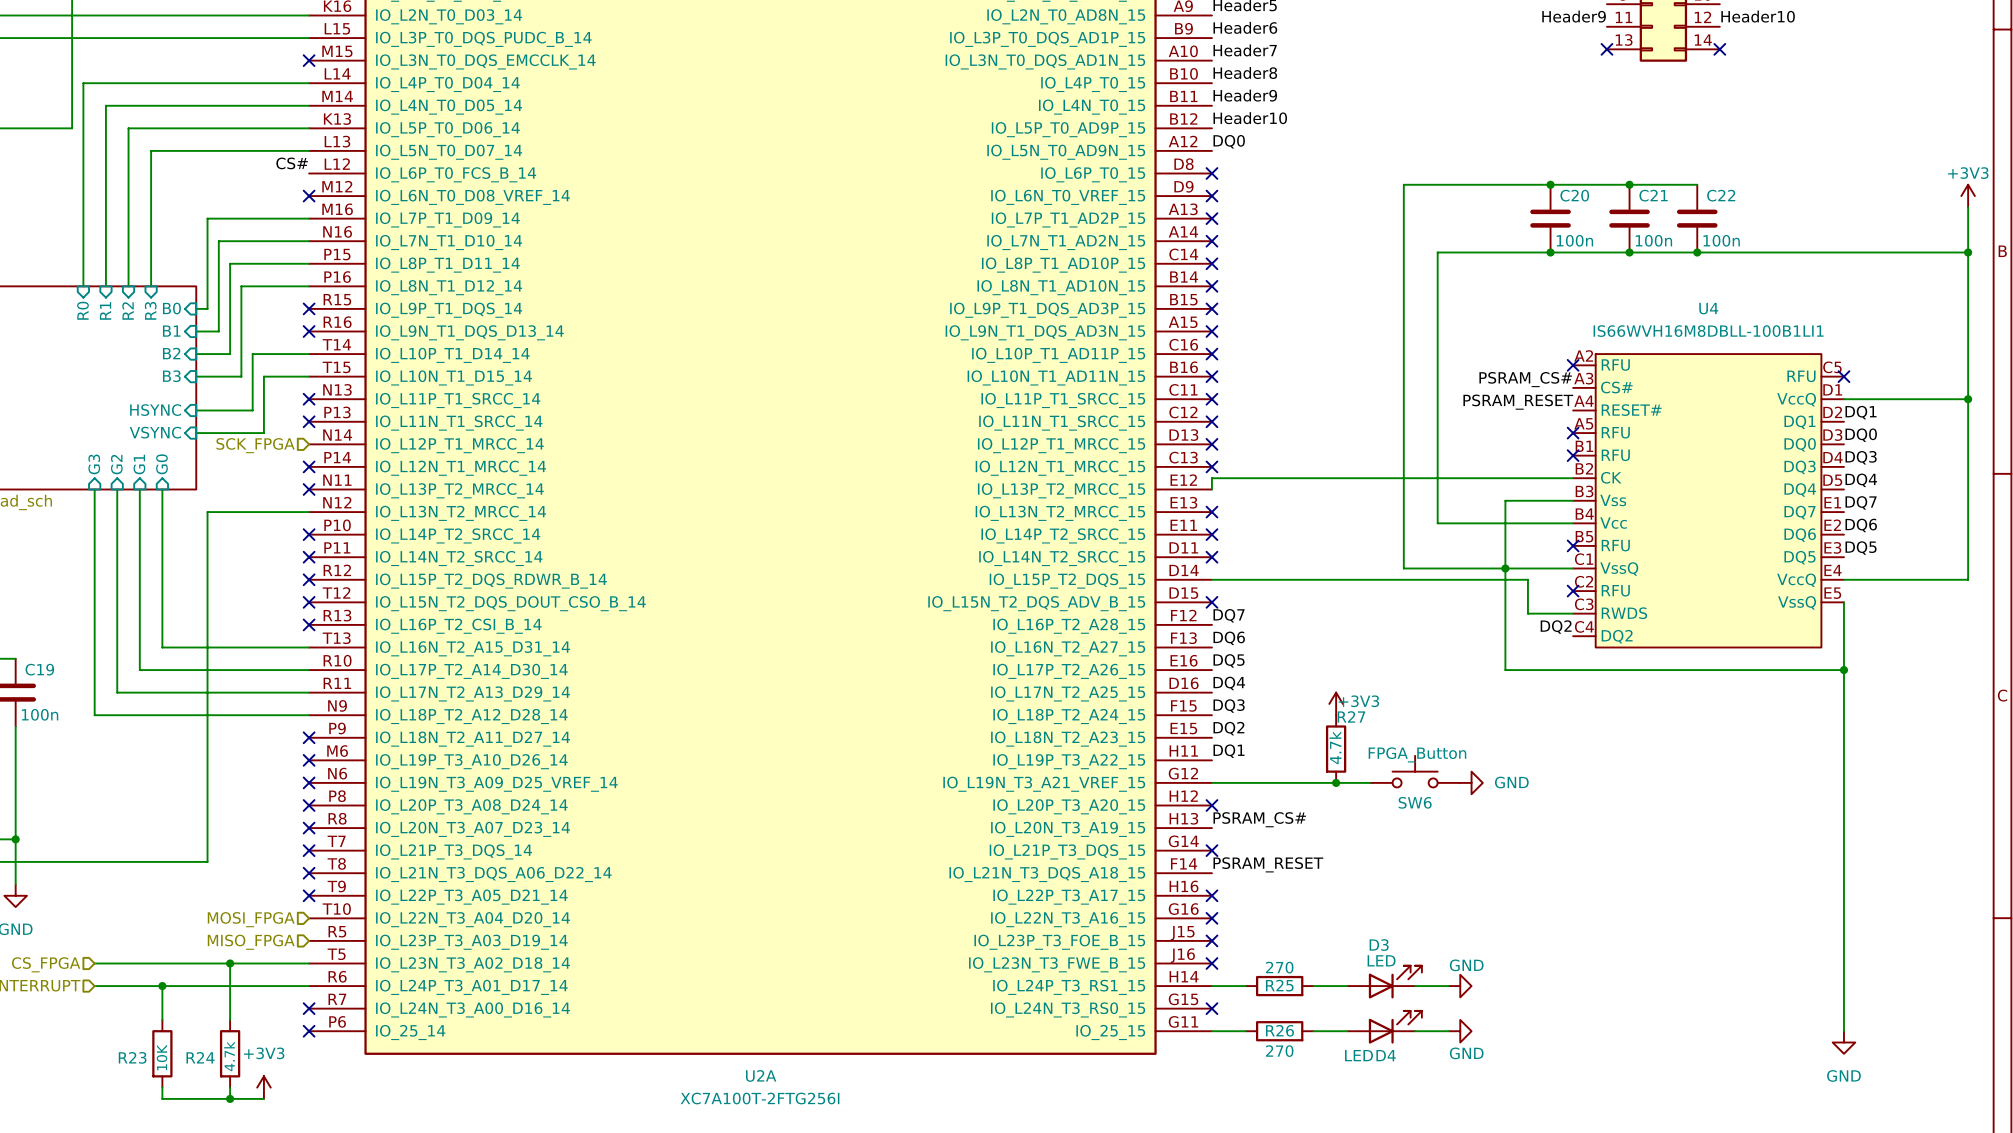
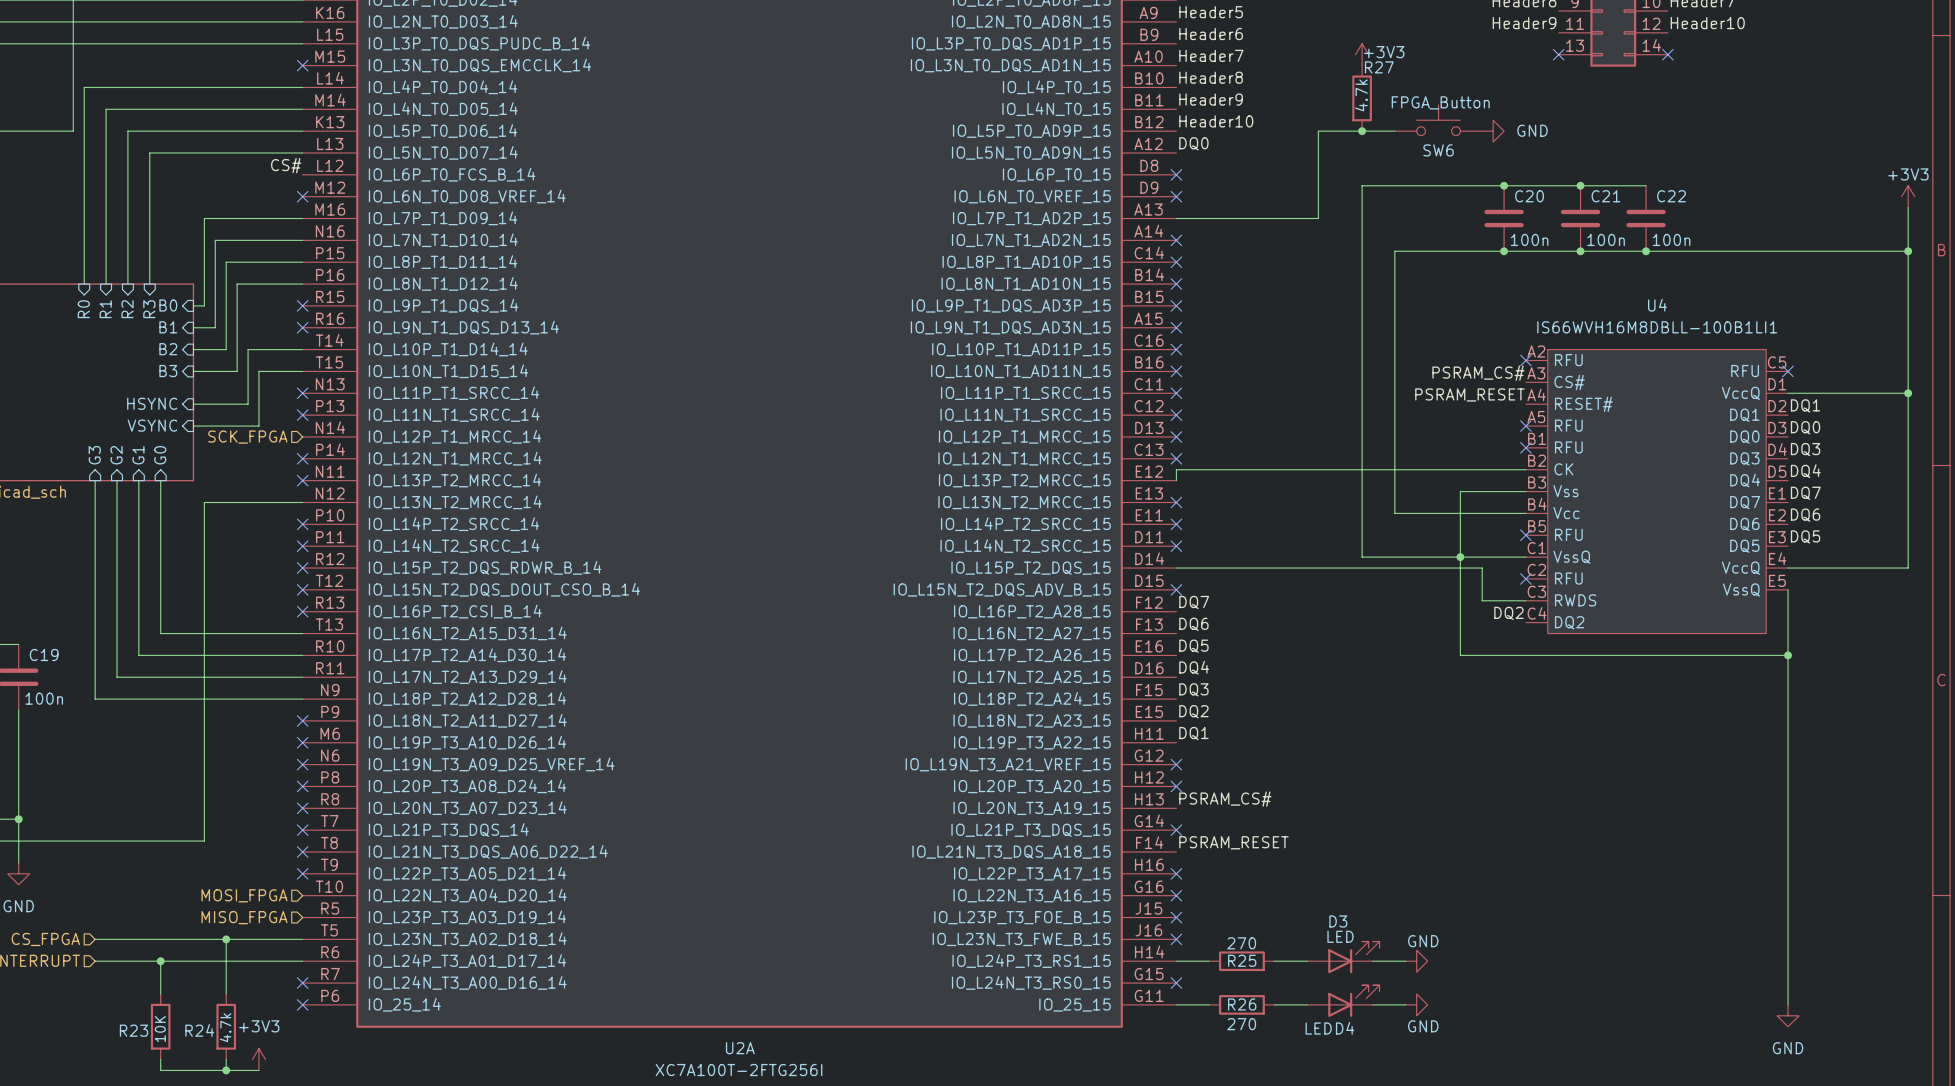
power symbol: none -> +3V3 (1362, 54)
junction: none -> (1362, 131)
wire: none -> (1394, 131) (1318, 131) (1318, 218) (1176, 218)
power symbol: none -> GND (1493, 131)
no-connect mark: (1211, 218) -> none
power symbol: +3V3 (1336, 703) -> none
R27 position: (1336, 749) -> (1362, 98)
SW6 position: (1415, 771) -> (1438, 120)
wire: (1211, 782) (1369, 782) -> none
no-connect mark: none -> (1176, 764)
junction: (1336, 782) -> none
power symbol: GND (1471, 782) -> none

